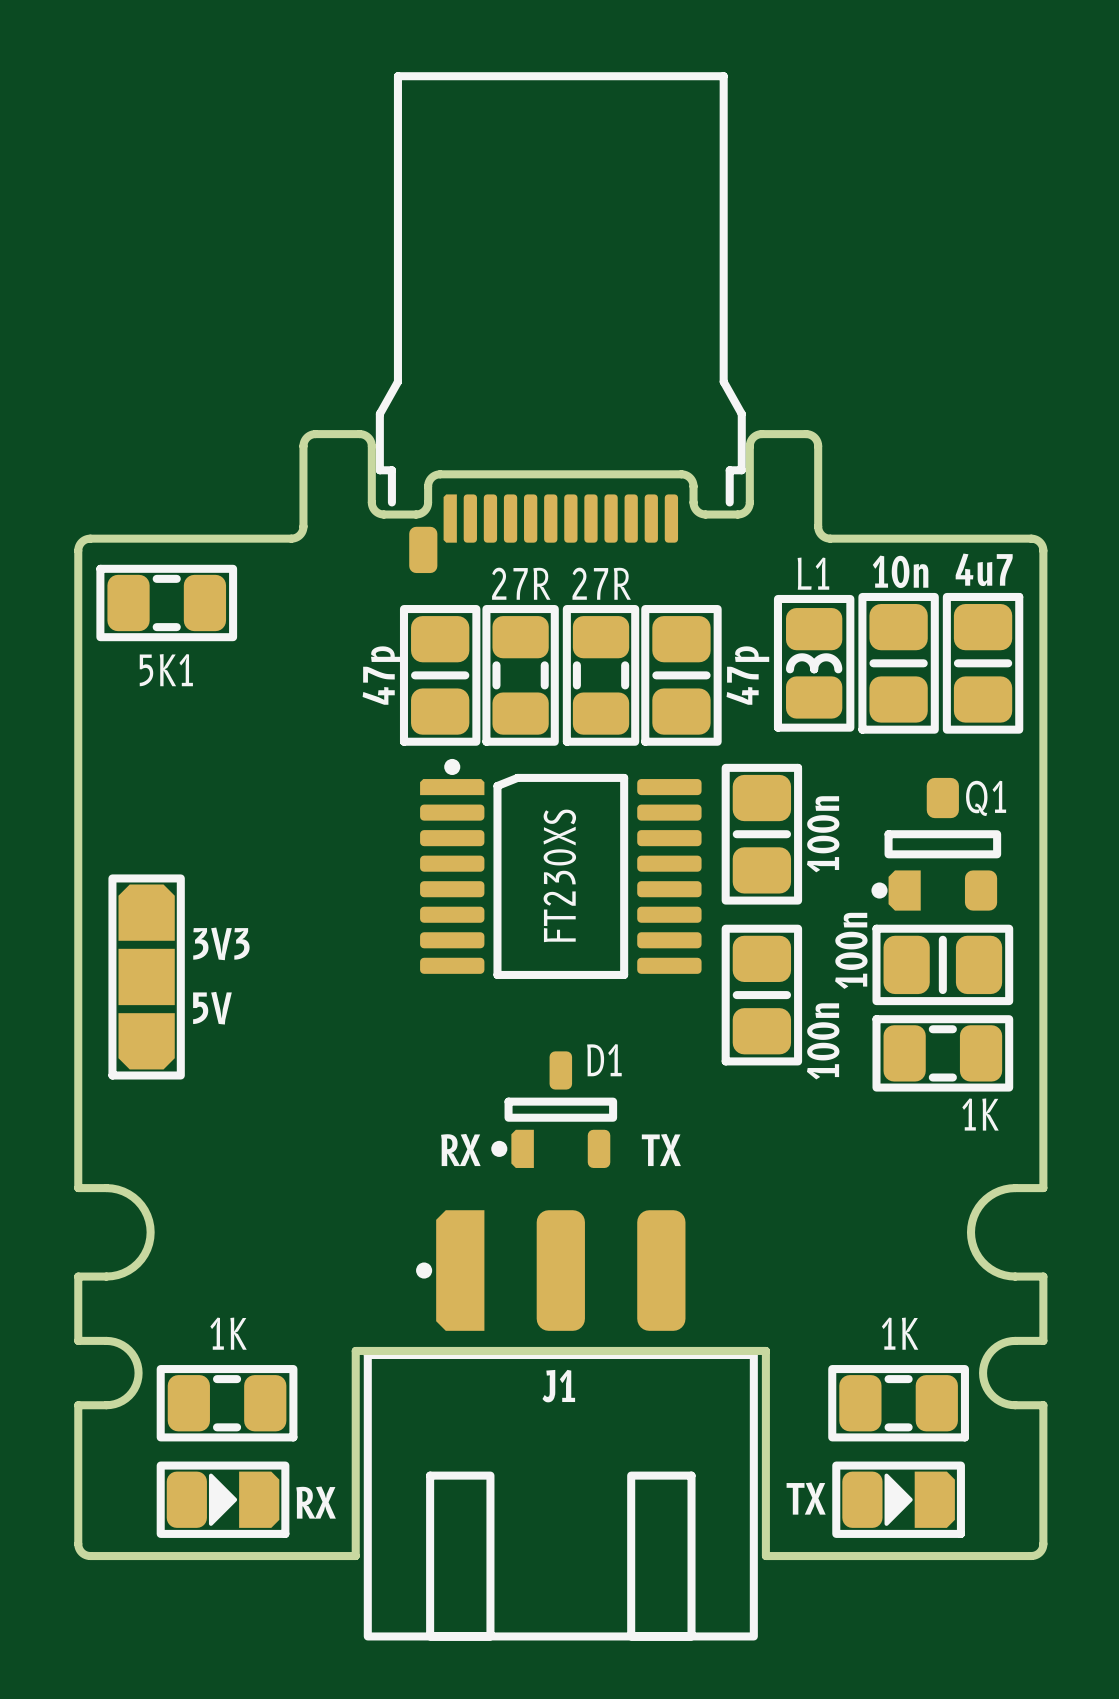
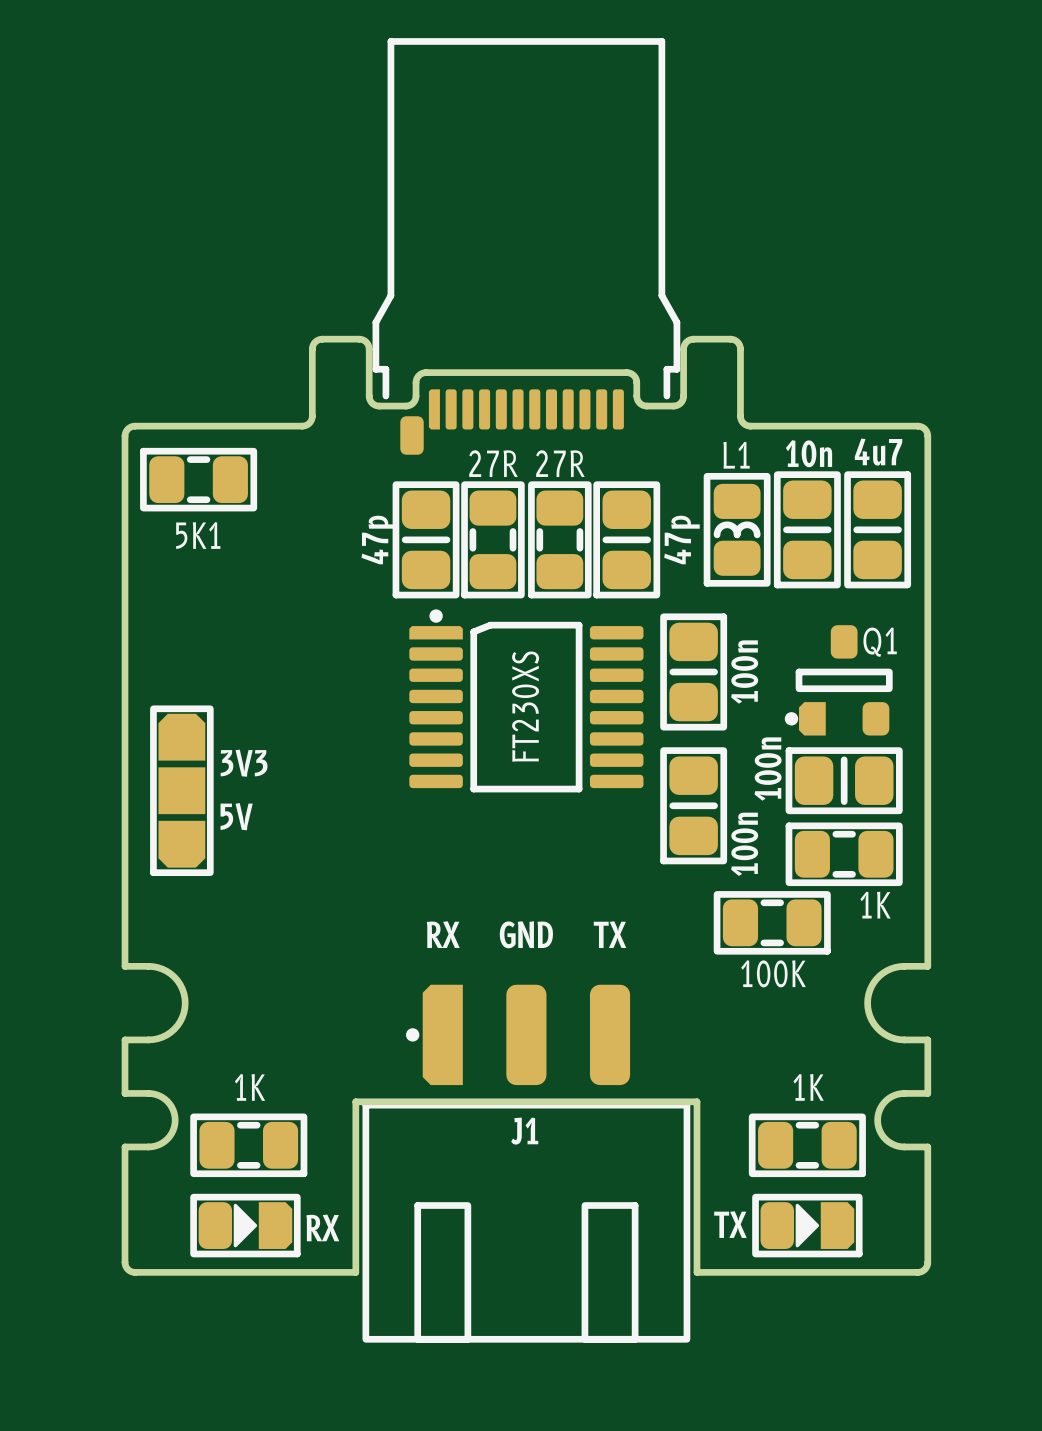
D1: (554, 1109) -> none
part: none -> 100K (772, 922)
text: none -> GND (526, 934)

